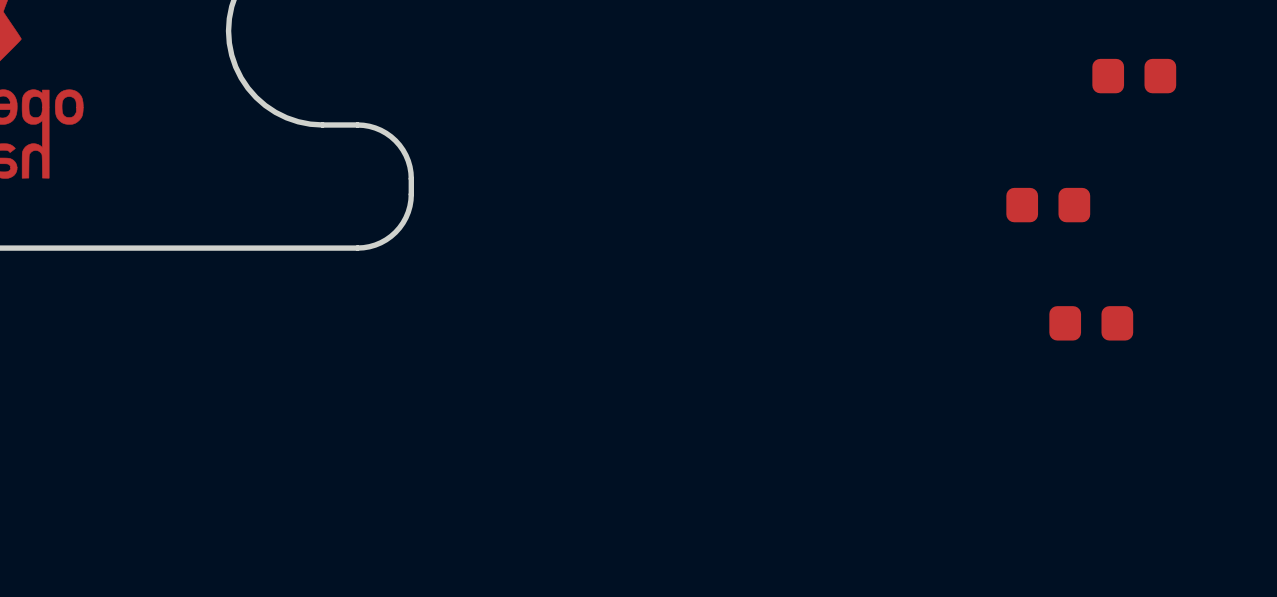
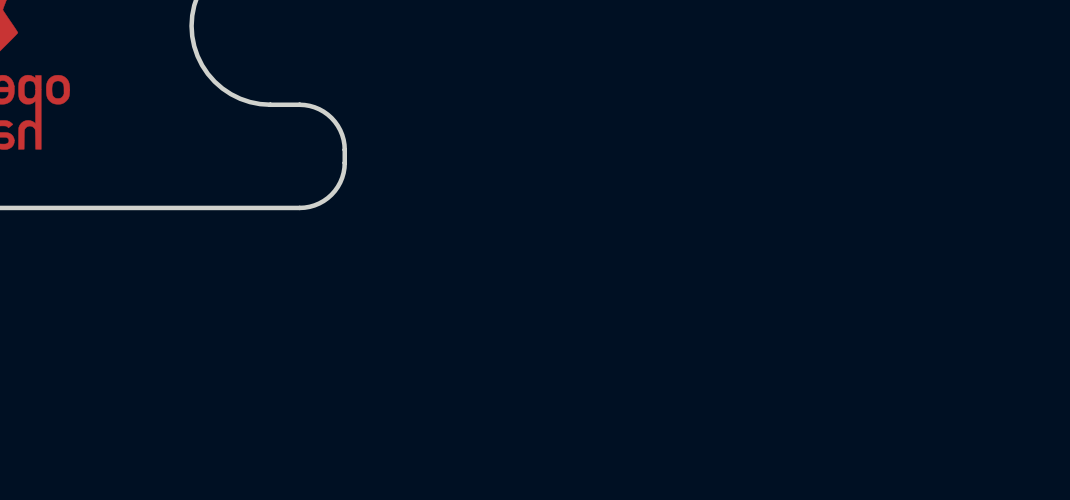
part: (1134, 76) -> none
part: (1048, 205) -> none
part: (1091, 323) -> none

